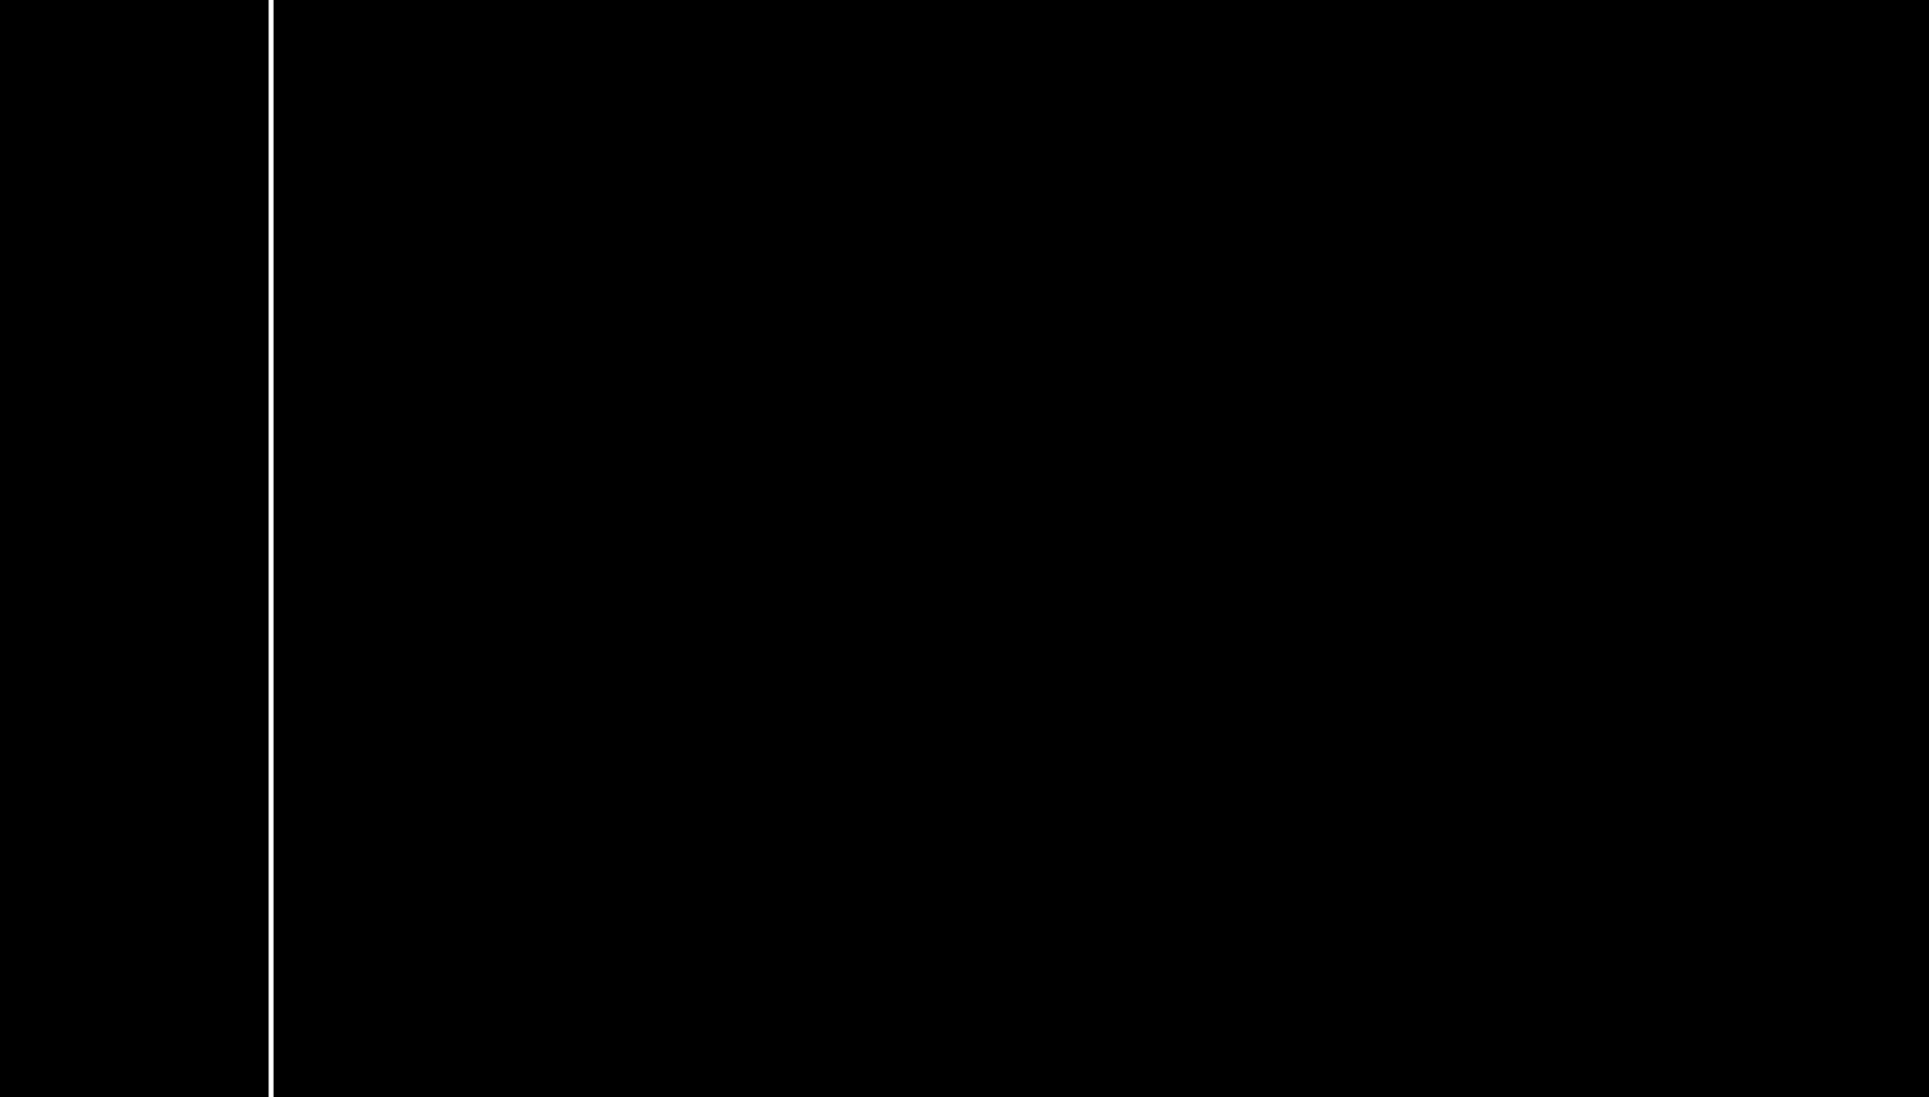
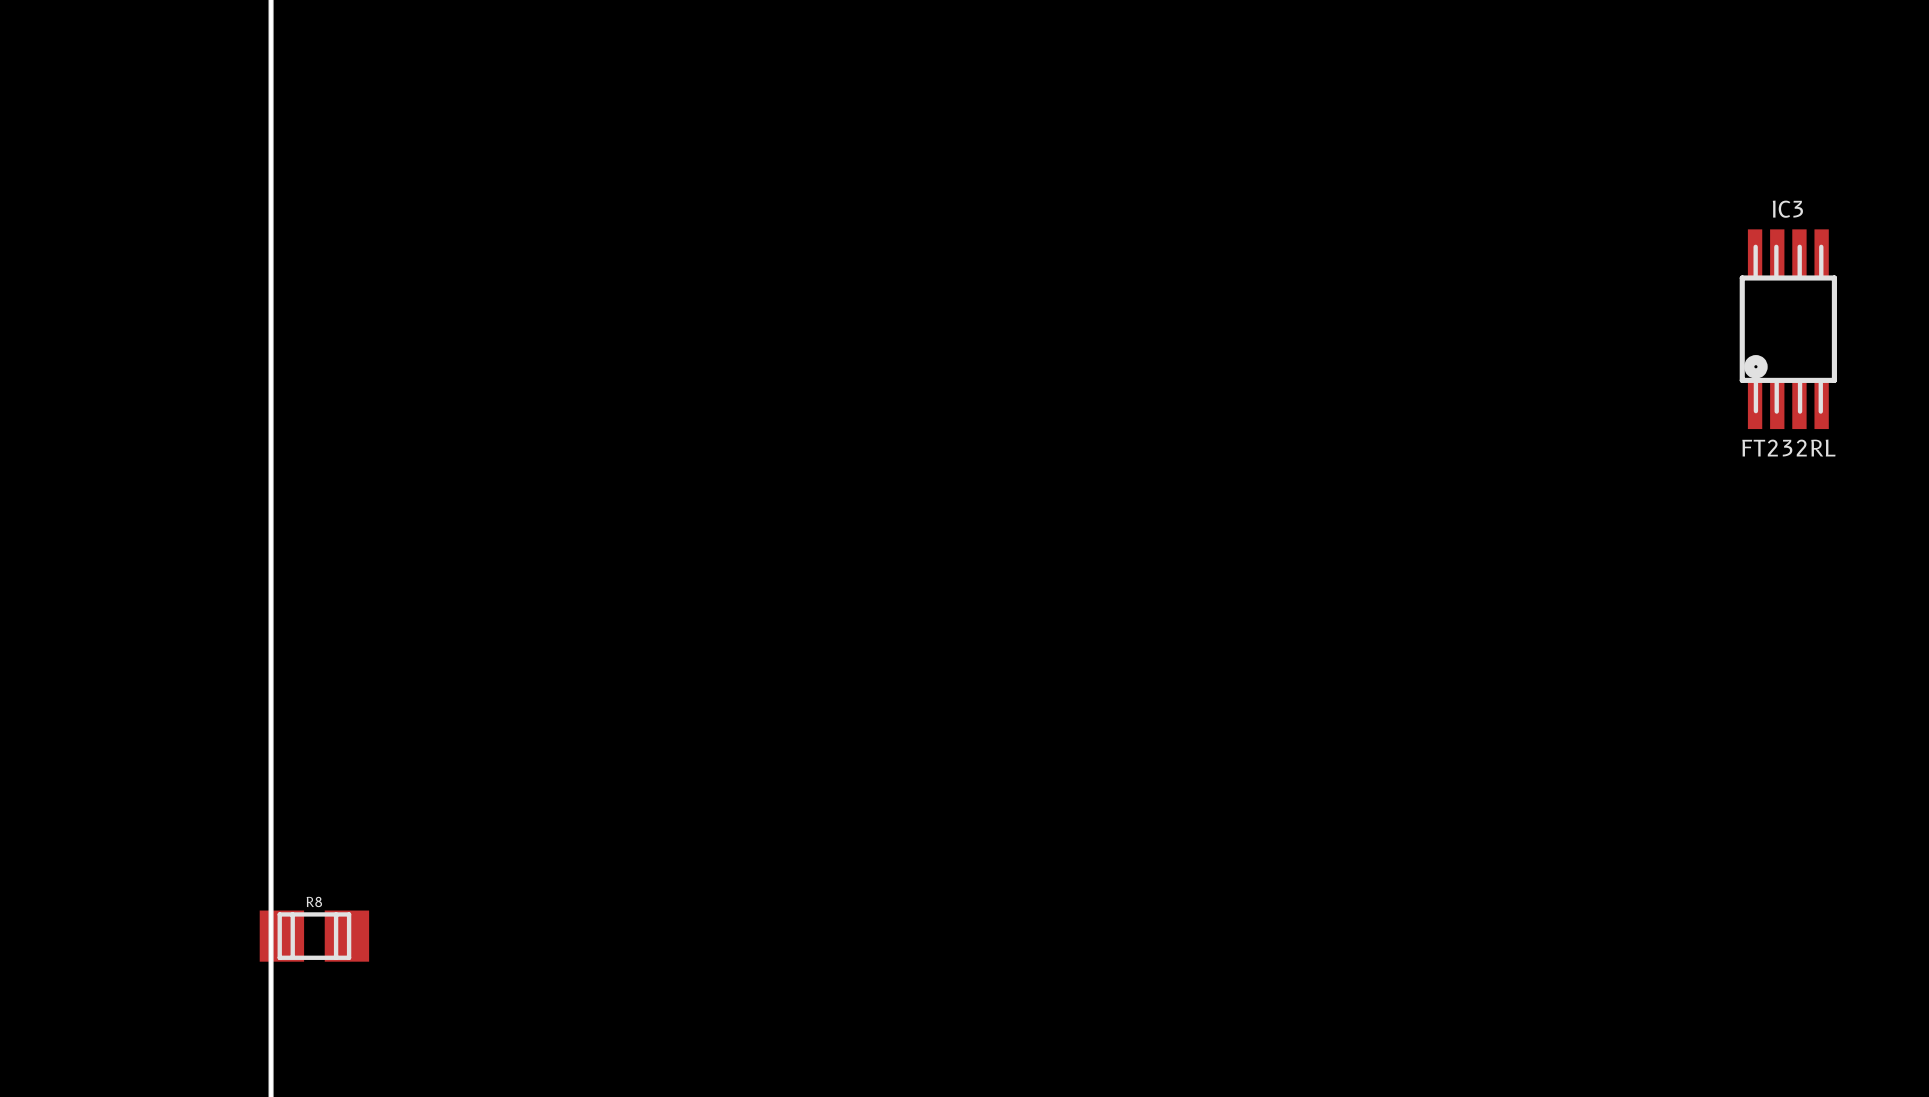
IC3: none -> FT232RL (1788, 329)
R8: none -> (314, 936)

